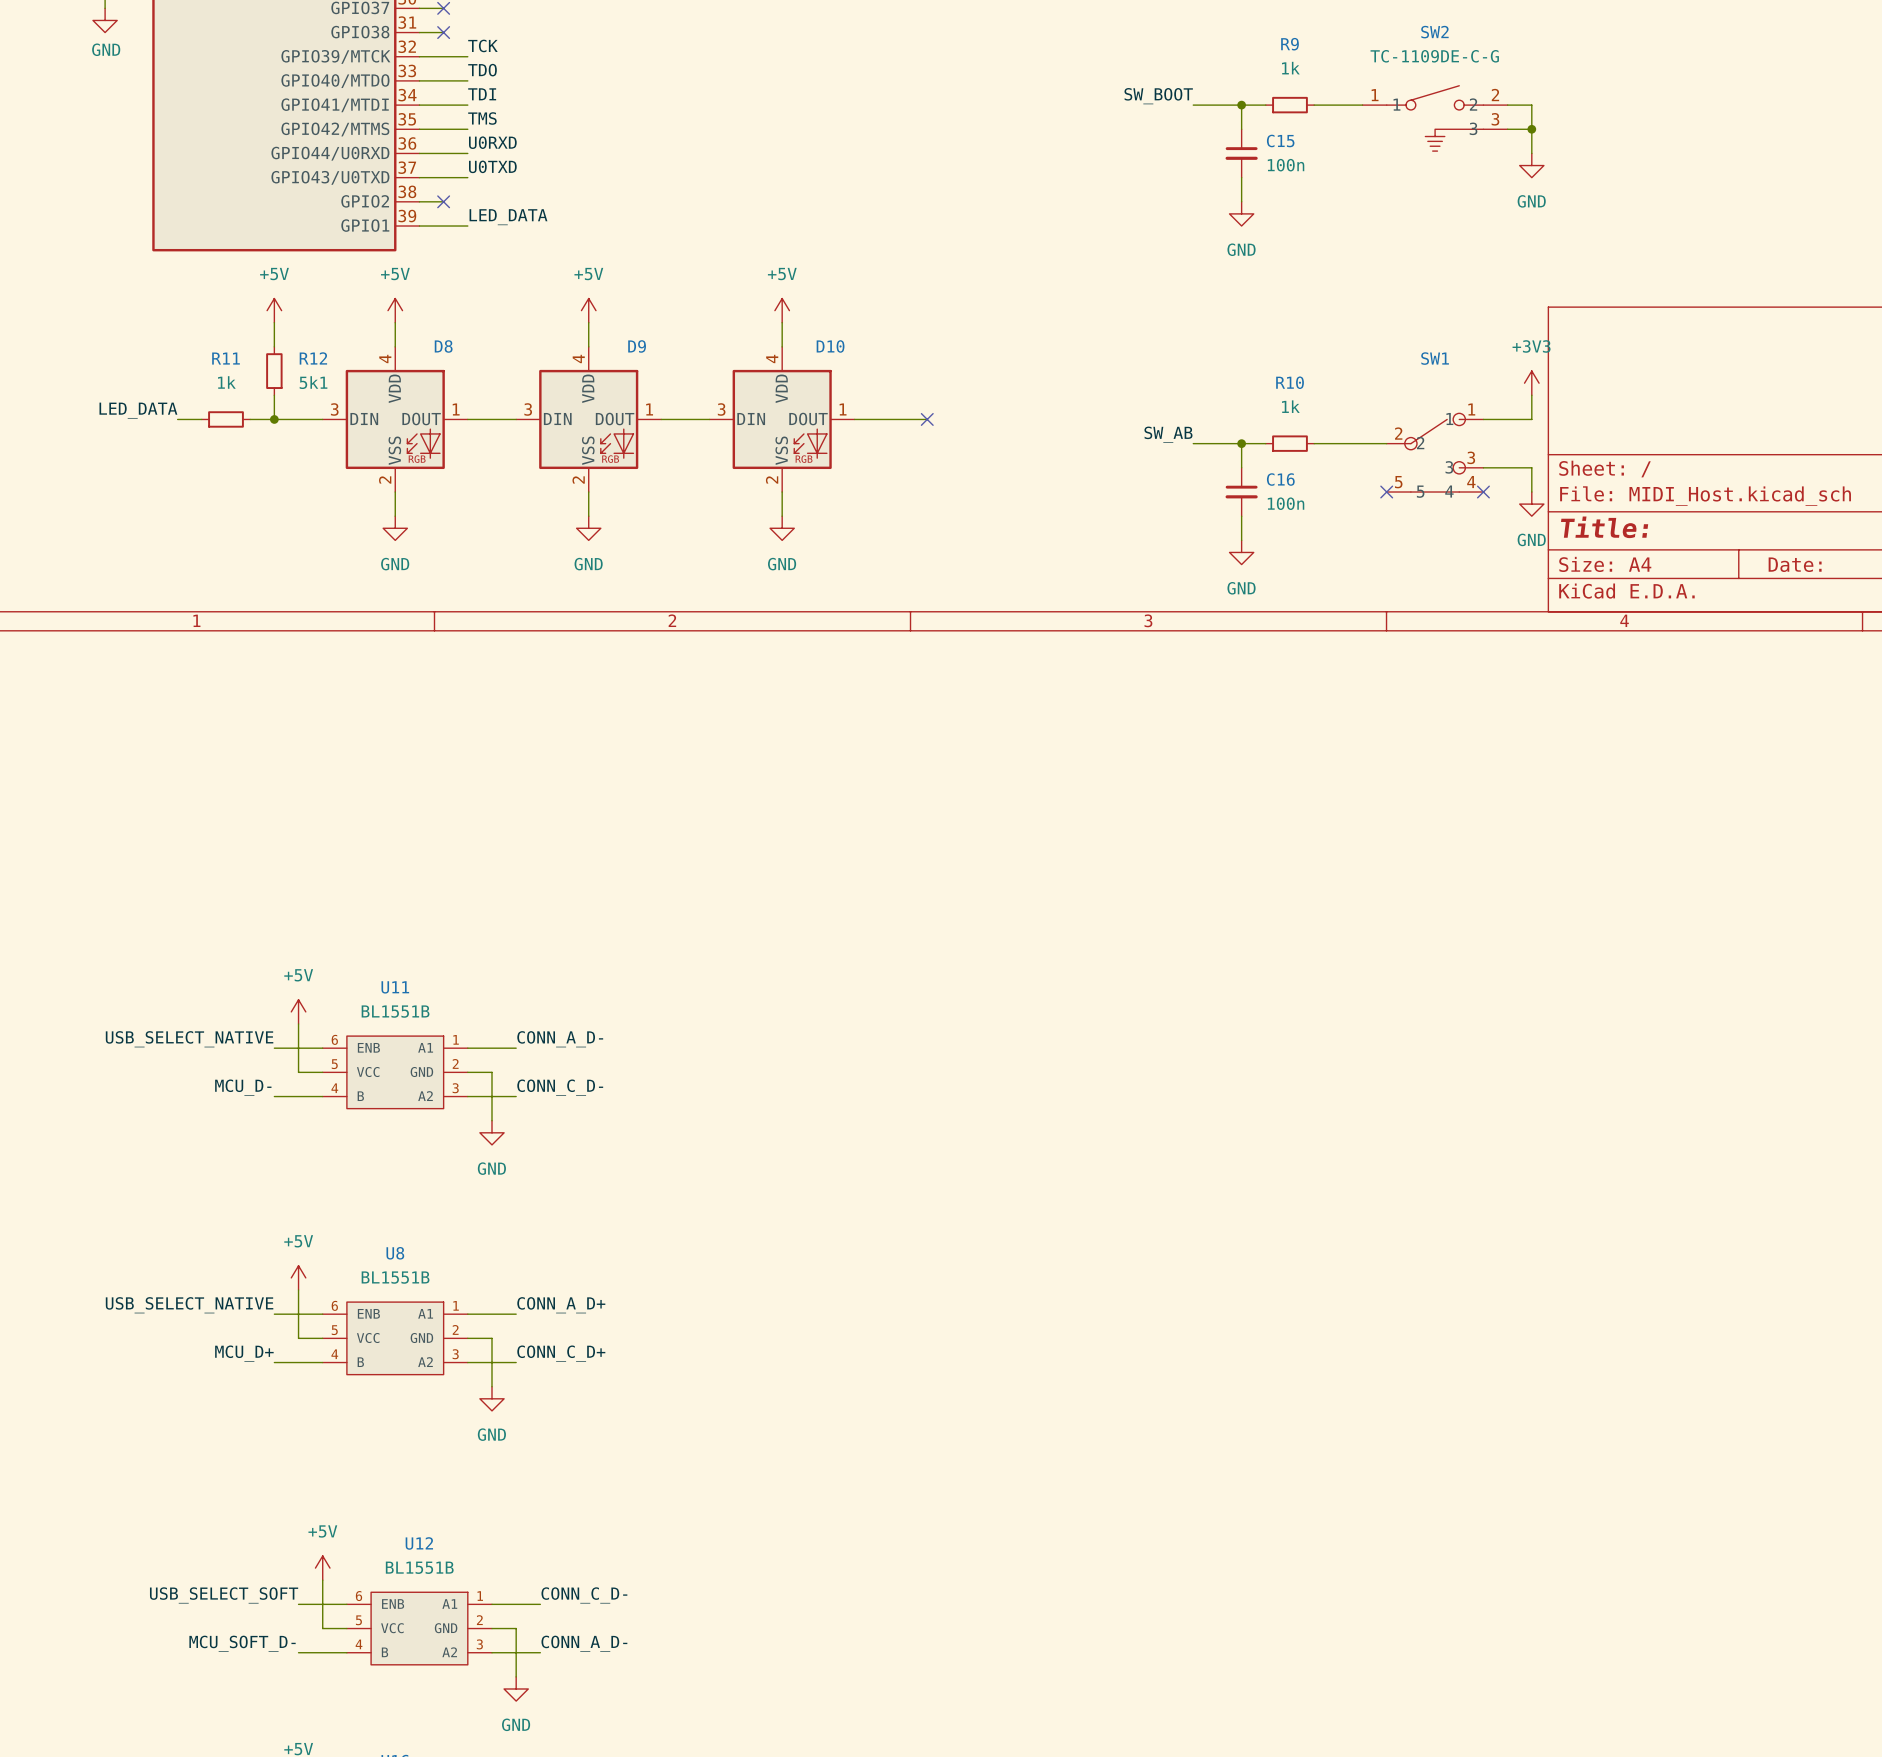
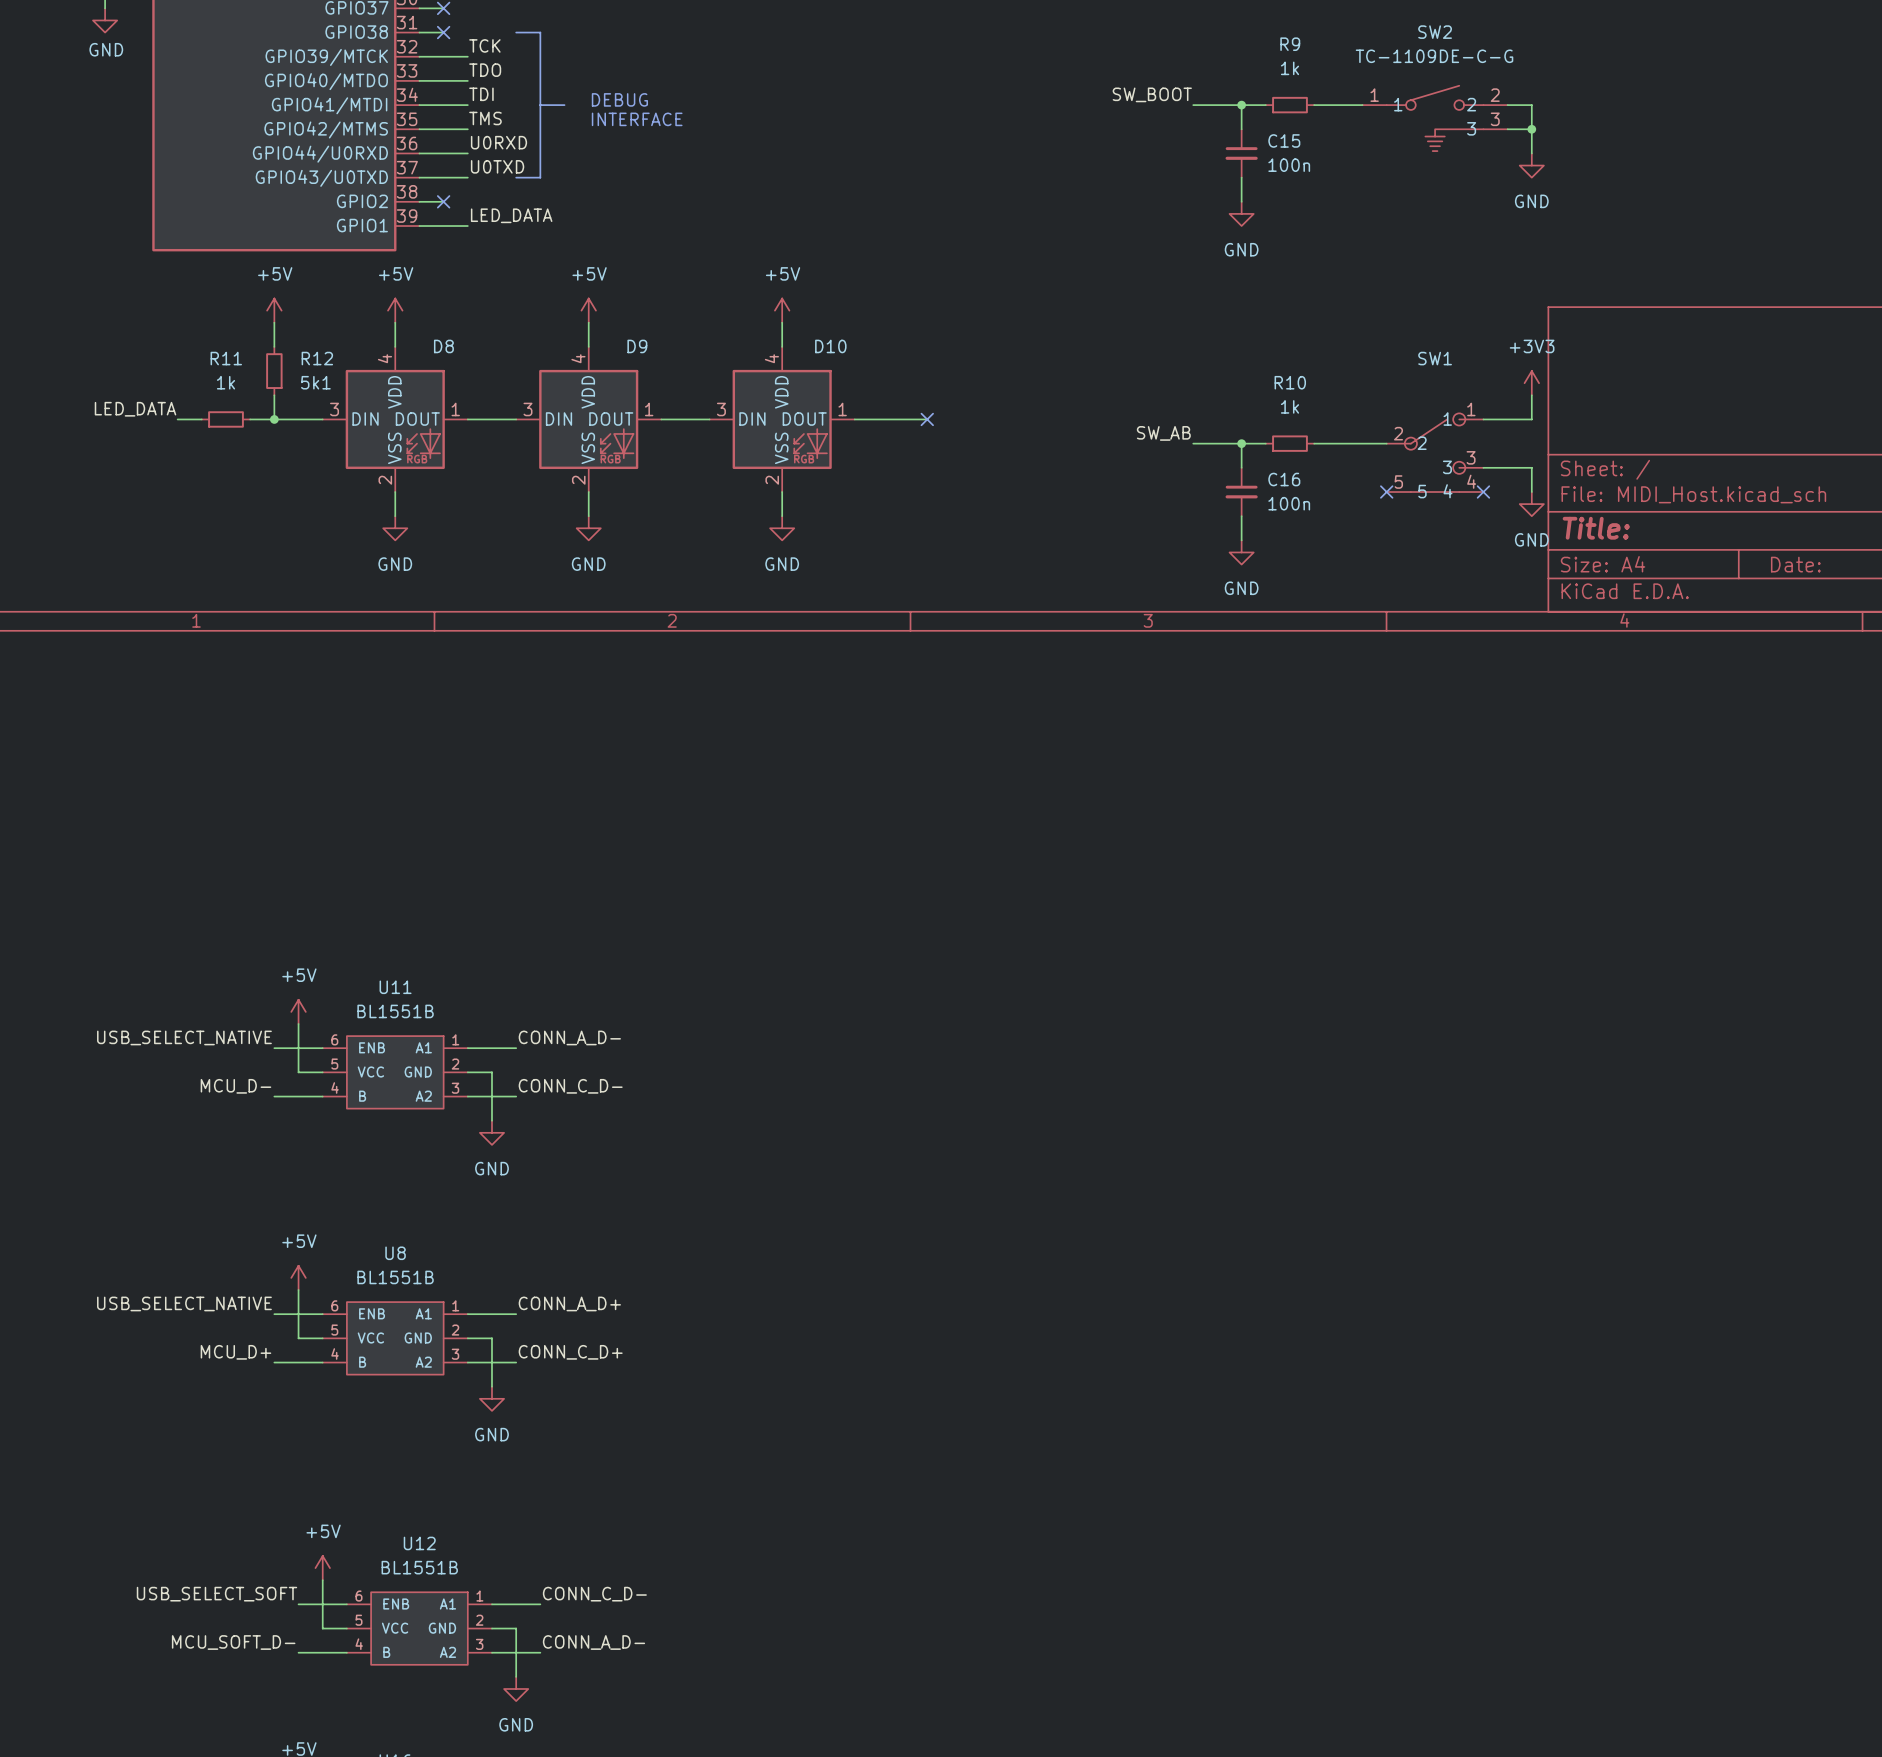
line: none -> (516, 32) (540, 32) (540, 177) (516, 177)
text: none -> DEBUG (619, 99)
line: none -> (540, 105) (564, 105)
text: none -> INTERFACE (637, 119)

